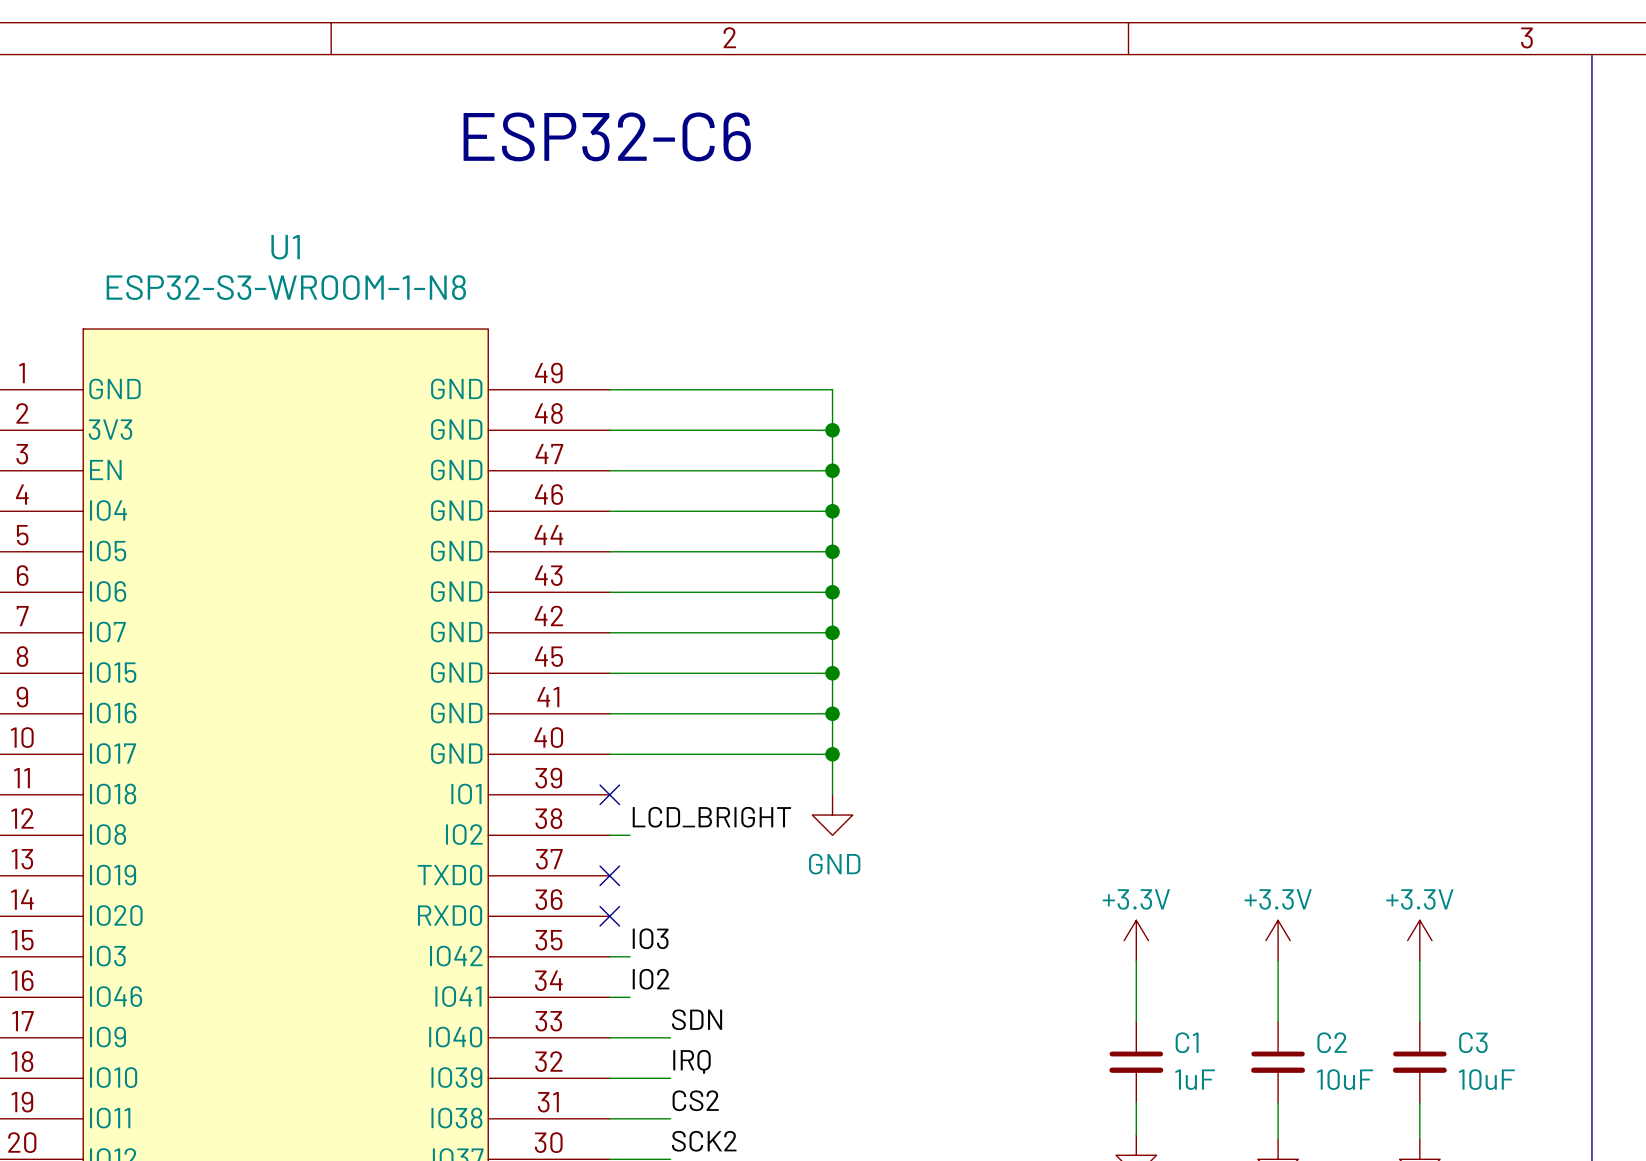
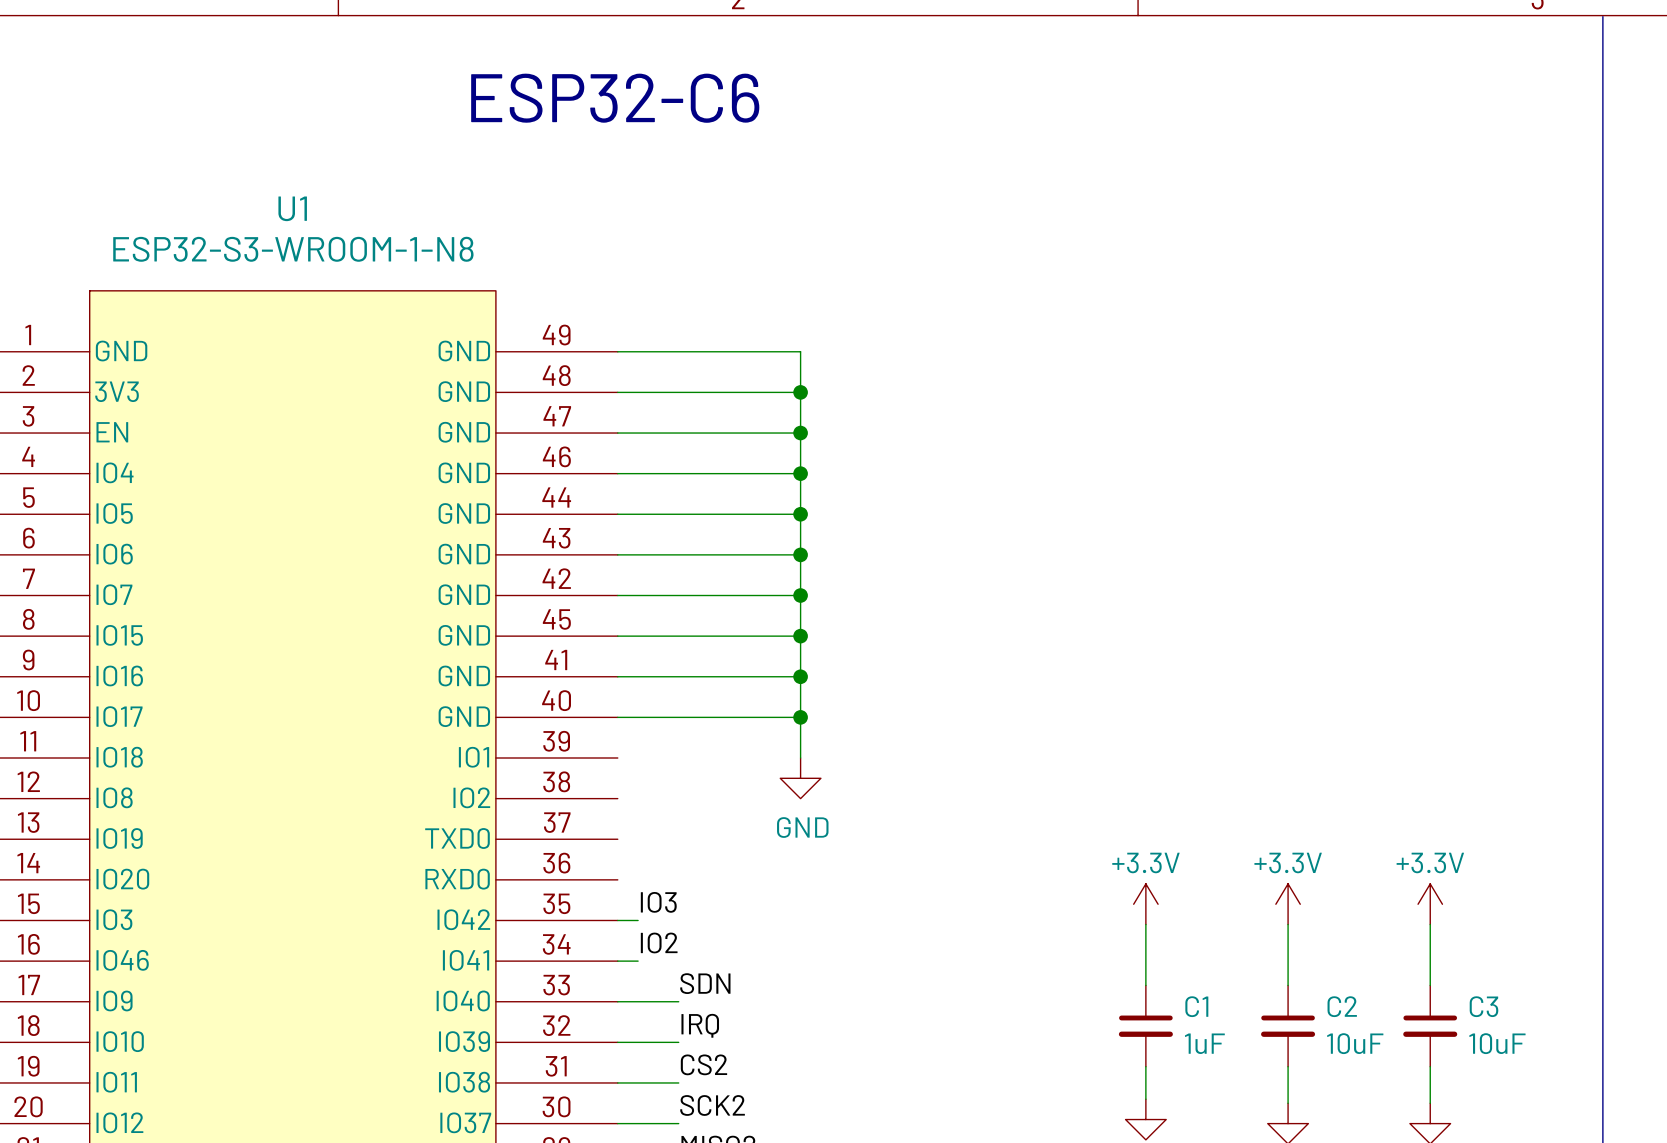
wire: (792, 389) (832, 389) (832, 794) -> (800, 351) (800, 758)
wire: (792, 430) (832, 430) -> none
junction: none -> (800, 392)
junction: (832, 430) -> none
wire: (792, 470) (832, 470) -> none
junction: none -> (800, 433)
junction: (832, 470) -> none
wire: (792, 511) (832, 511) -> none
junction: none -> (800, 473)
junction: (832, 511) -> none
wire: (792, 551) (832, 551) -> none
junction: none -> (800, 514)
junction: (832, 551) -> none
wire: (792, 592) (832, 592) -> none
junction: none -> (800, 554)
junction: (832, 592) -> none
wire: (792, 632) (832, 632) -> none
junction: none -> (800, 595)
junction: (832, 632) -> none
wire: (792, 673) (832, 673) -> none
junction: none -> (800, 636)
junction: (832, 673) -> none
wire: (792, 713) (832, 713) -> none
junction: none -> (800, 676)
junction: (832, 713) -> none
wire: (792, 754) (832, 754) -> none
junction: none -> (800, 717)
junction: (832, 754) -> none
no-connect mark: (609, 794) -> none
power symbol position: GND (832, 815) -> GND (800, 778)
label: LCD_BRIGHT (711, 817) -> none
wire: (609, 835) (630, 835) -> none
no-connect mark: (609, 875) -> none
no-connect mark: (609, 916) -> none

